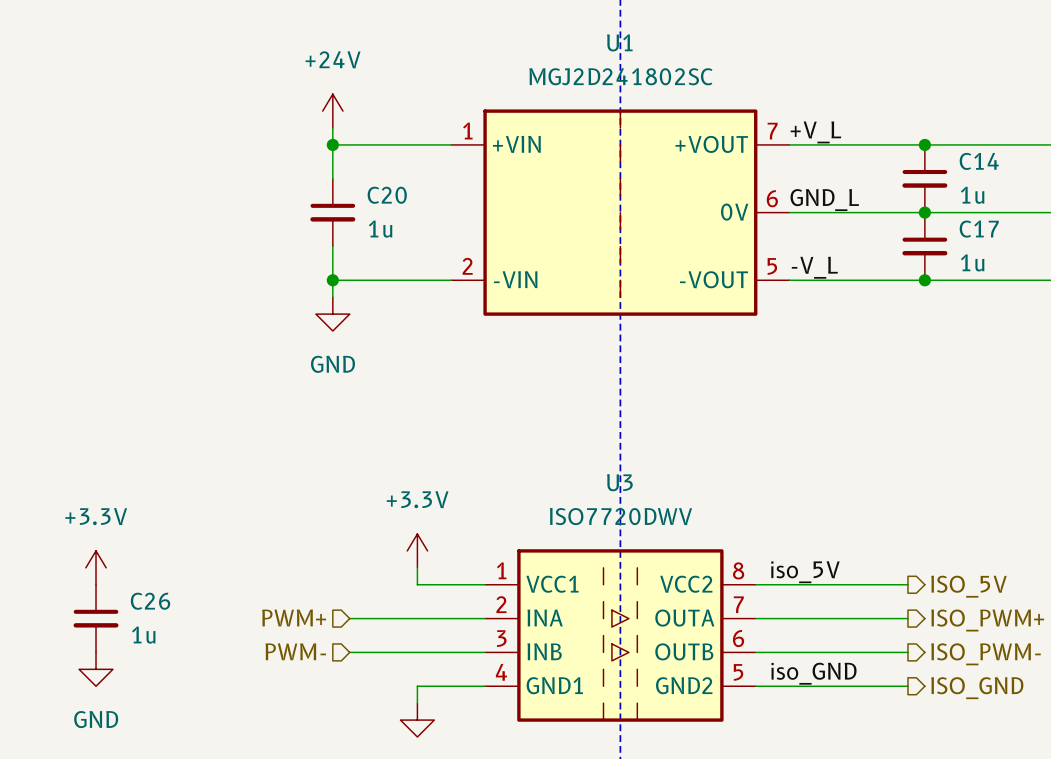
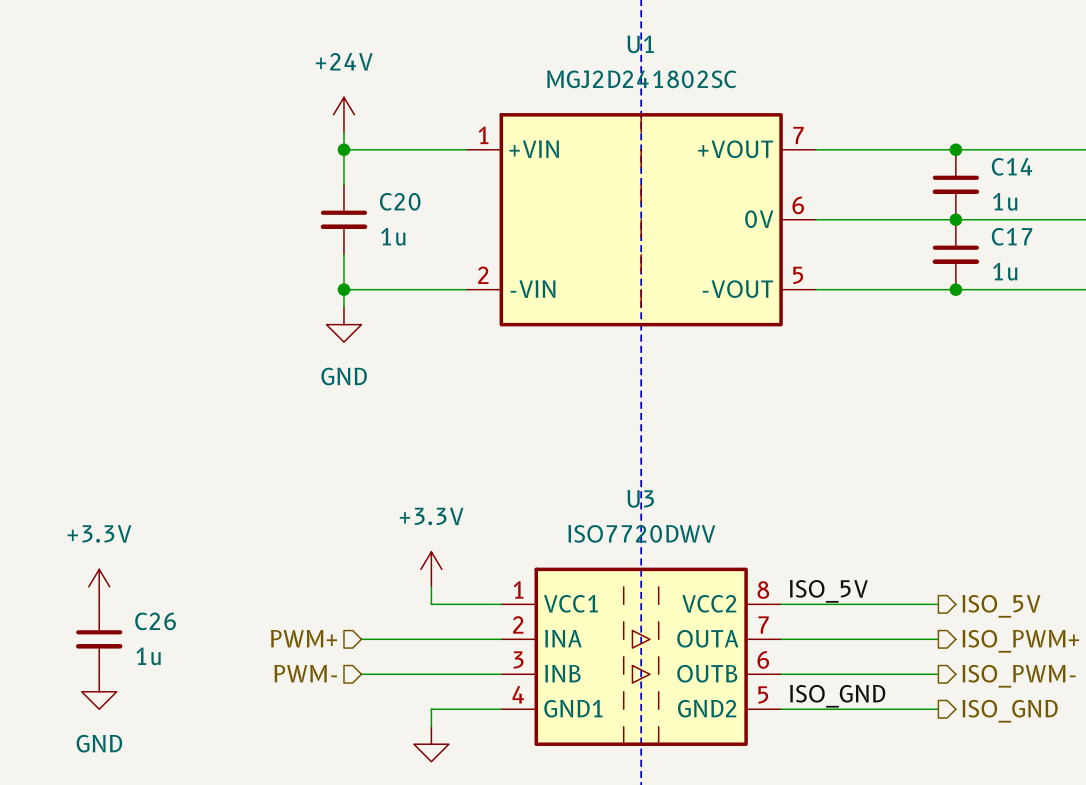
label: +V_L (815, 132) -> none
label: GND_L (824, 200) -> none
label: -V_L (814, 267) -> none
label: iso_5V (805, 572) -> ISO_5V (828, 591)
label: iso_GND (814, 673) -> ISO_GND (837, 696)

